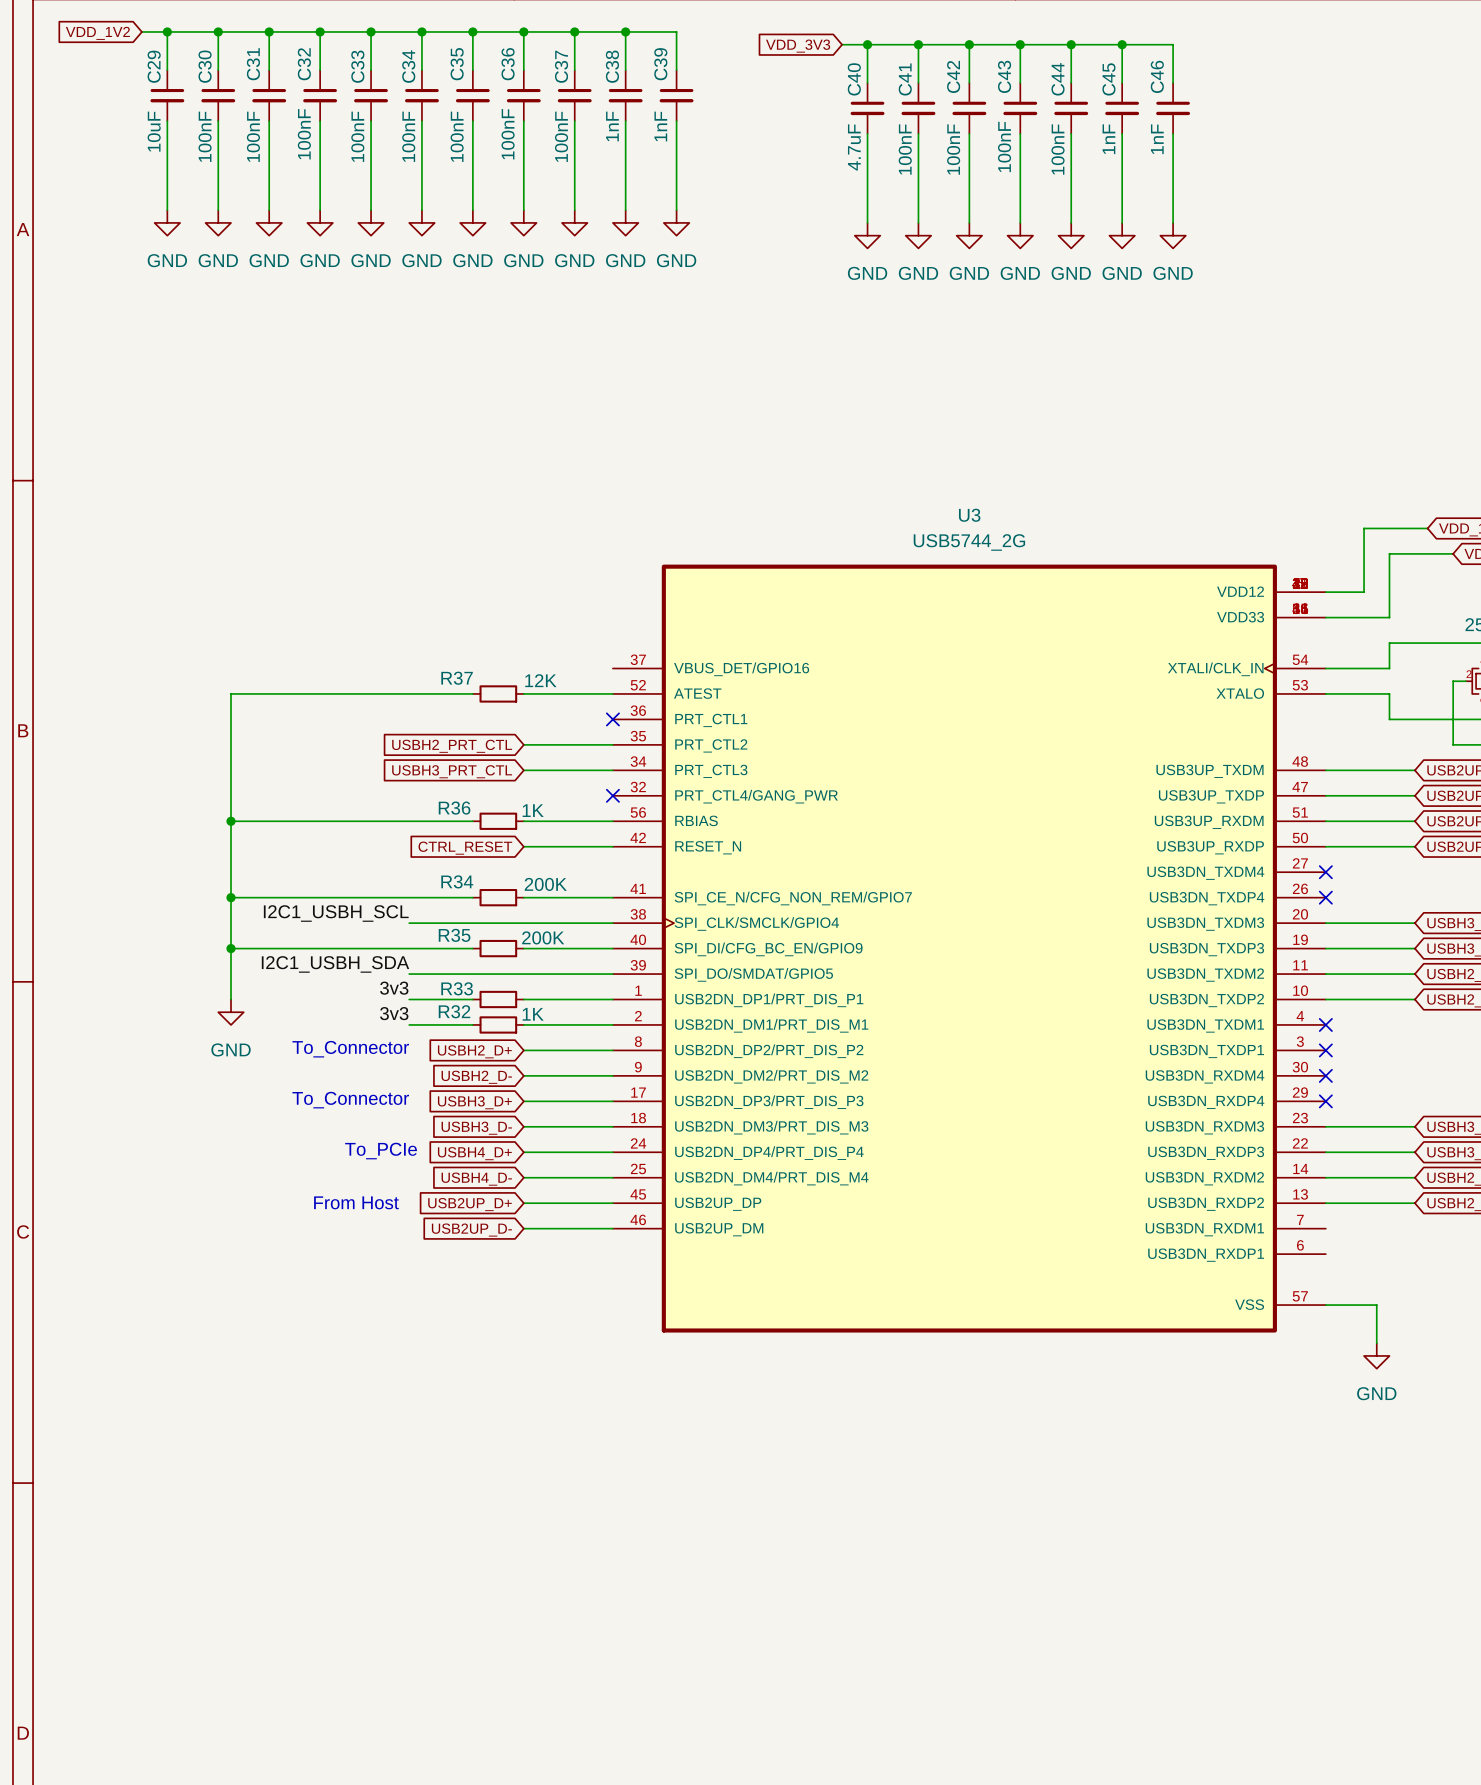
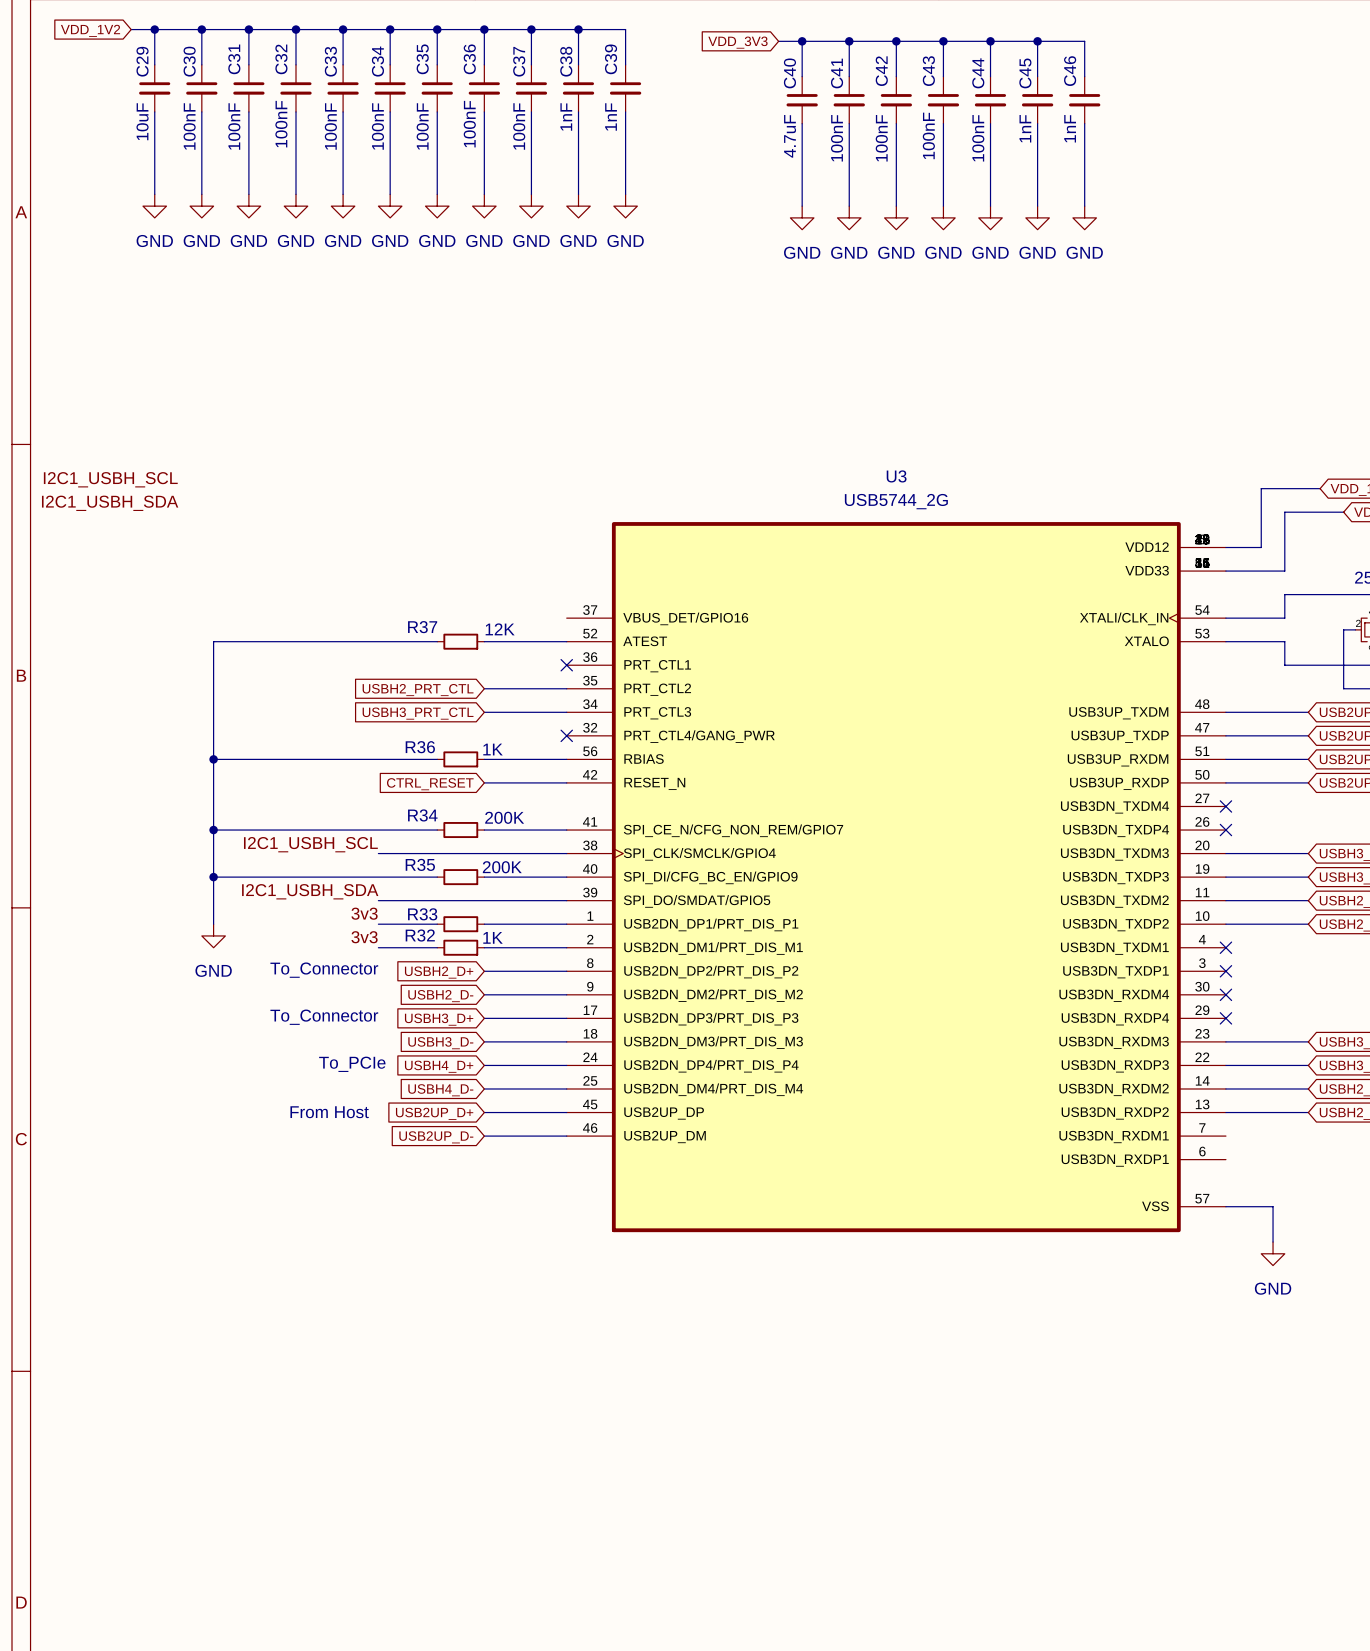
label: none -> I2C1_USBH_SCL (110, 479)
label: none -> I2C1_USBH_SDA (110, 503)

